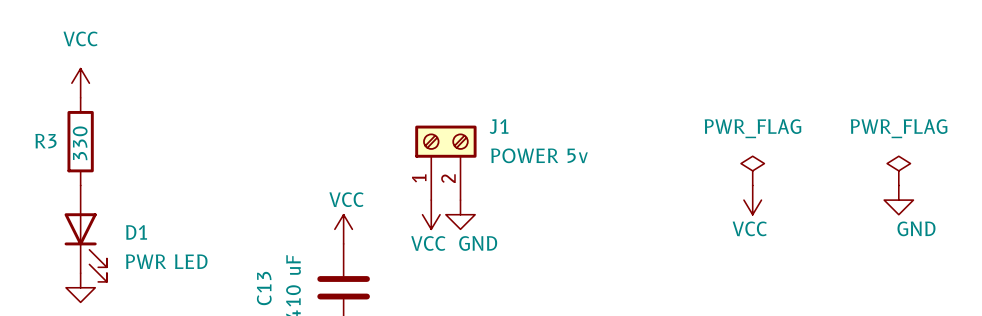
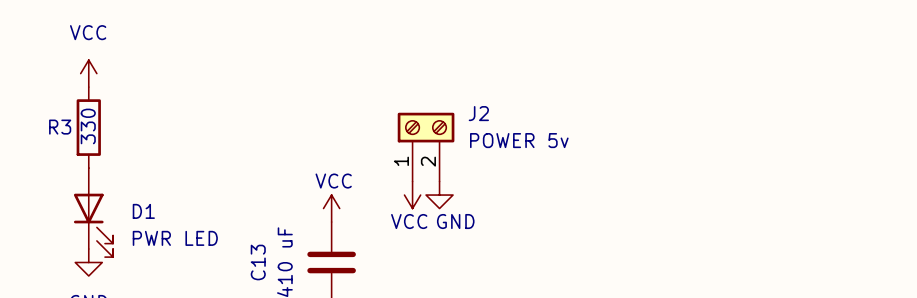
J1 name: J1 (499, 126) -> J2 (478, 113)
power symbol: PWR_FLAG (752, 170) -> none
power symbol: PWR_FLAG (898, 170) -> none
power symbol: VCC (752, 200) -> none
power symbol: GND (898, 200) -> none

